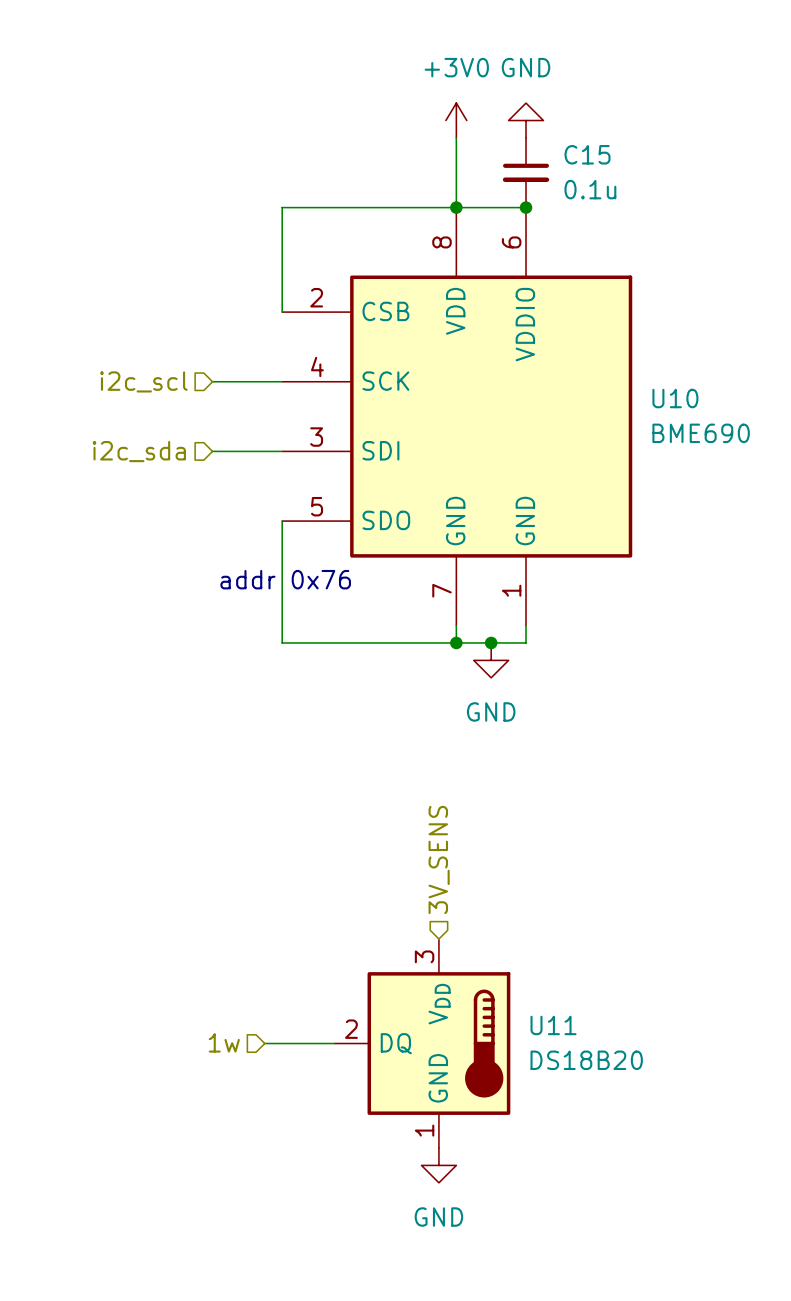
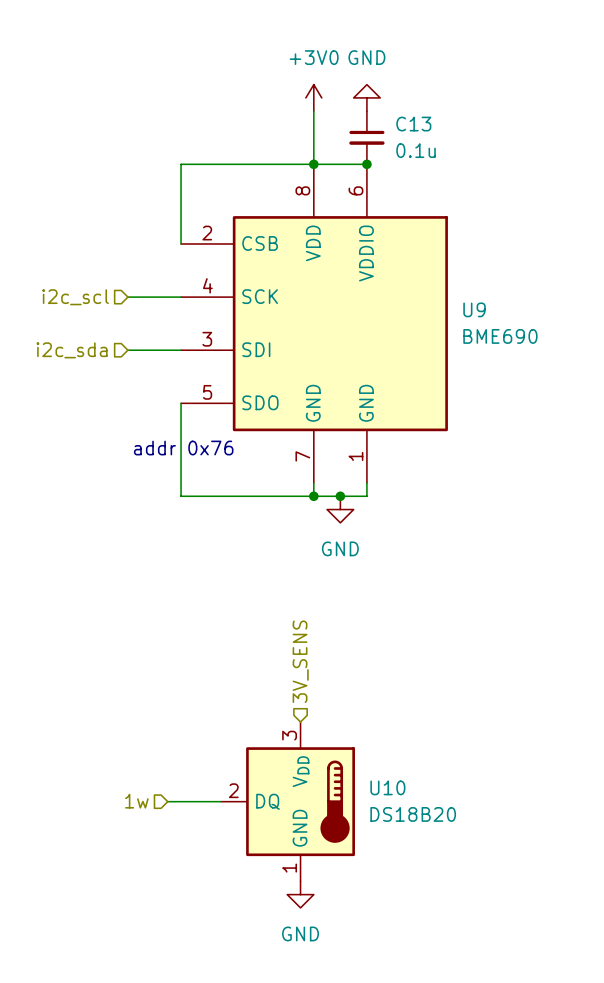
C15 name: C15 (587, 154) -> C13 (413, 124)
U10 name: U10 (675, 398) -> U9 (474, 309)
U11 name: U11 (553, 1025) -> U10 (387, 787)

